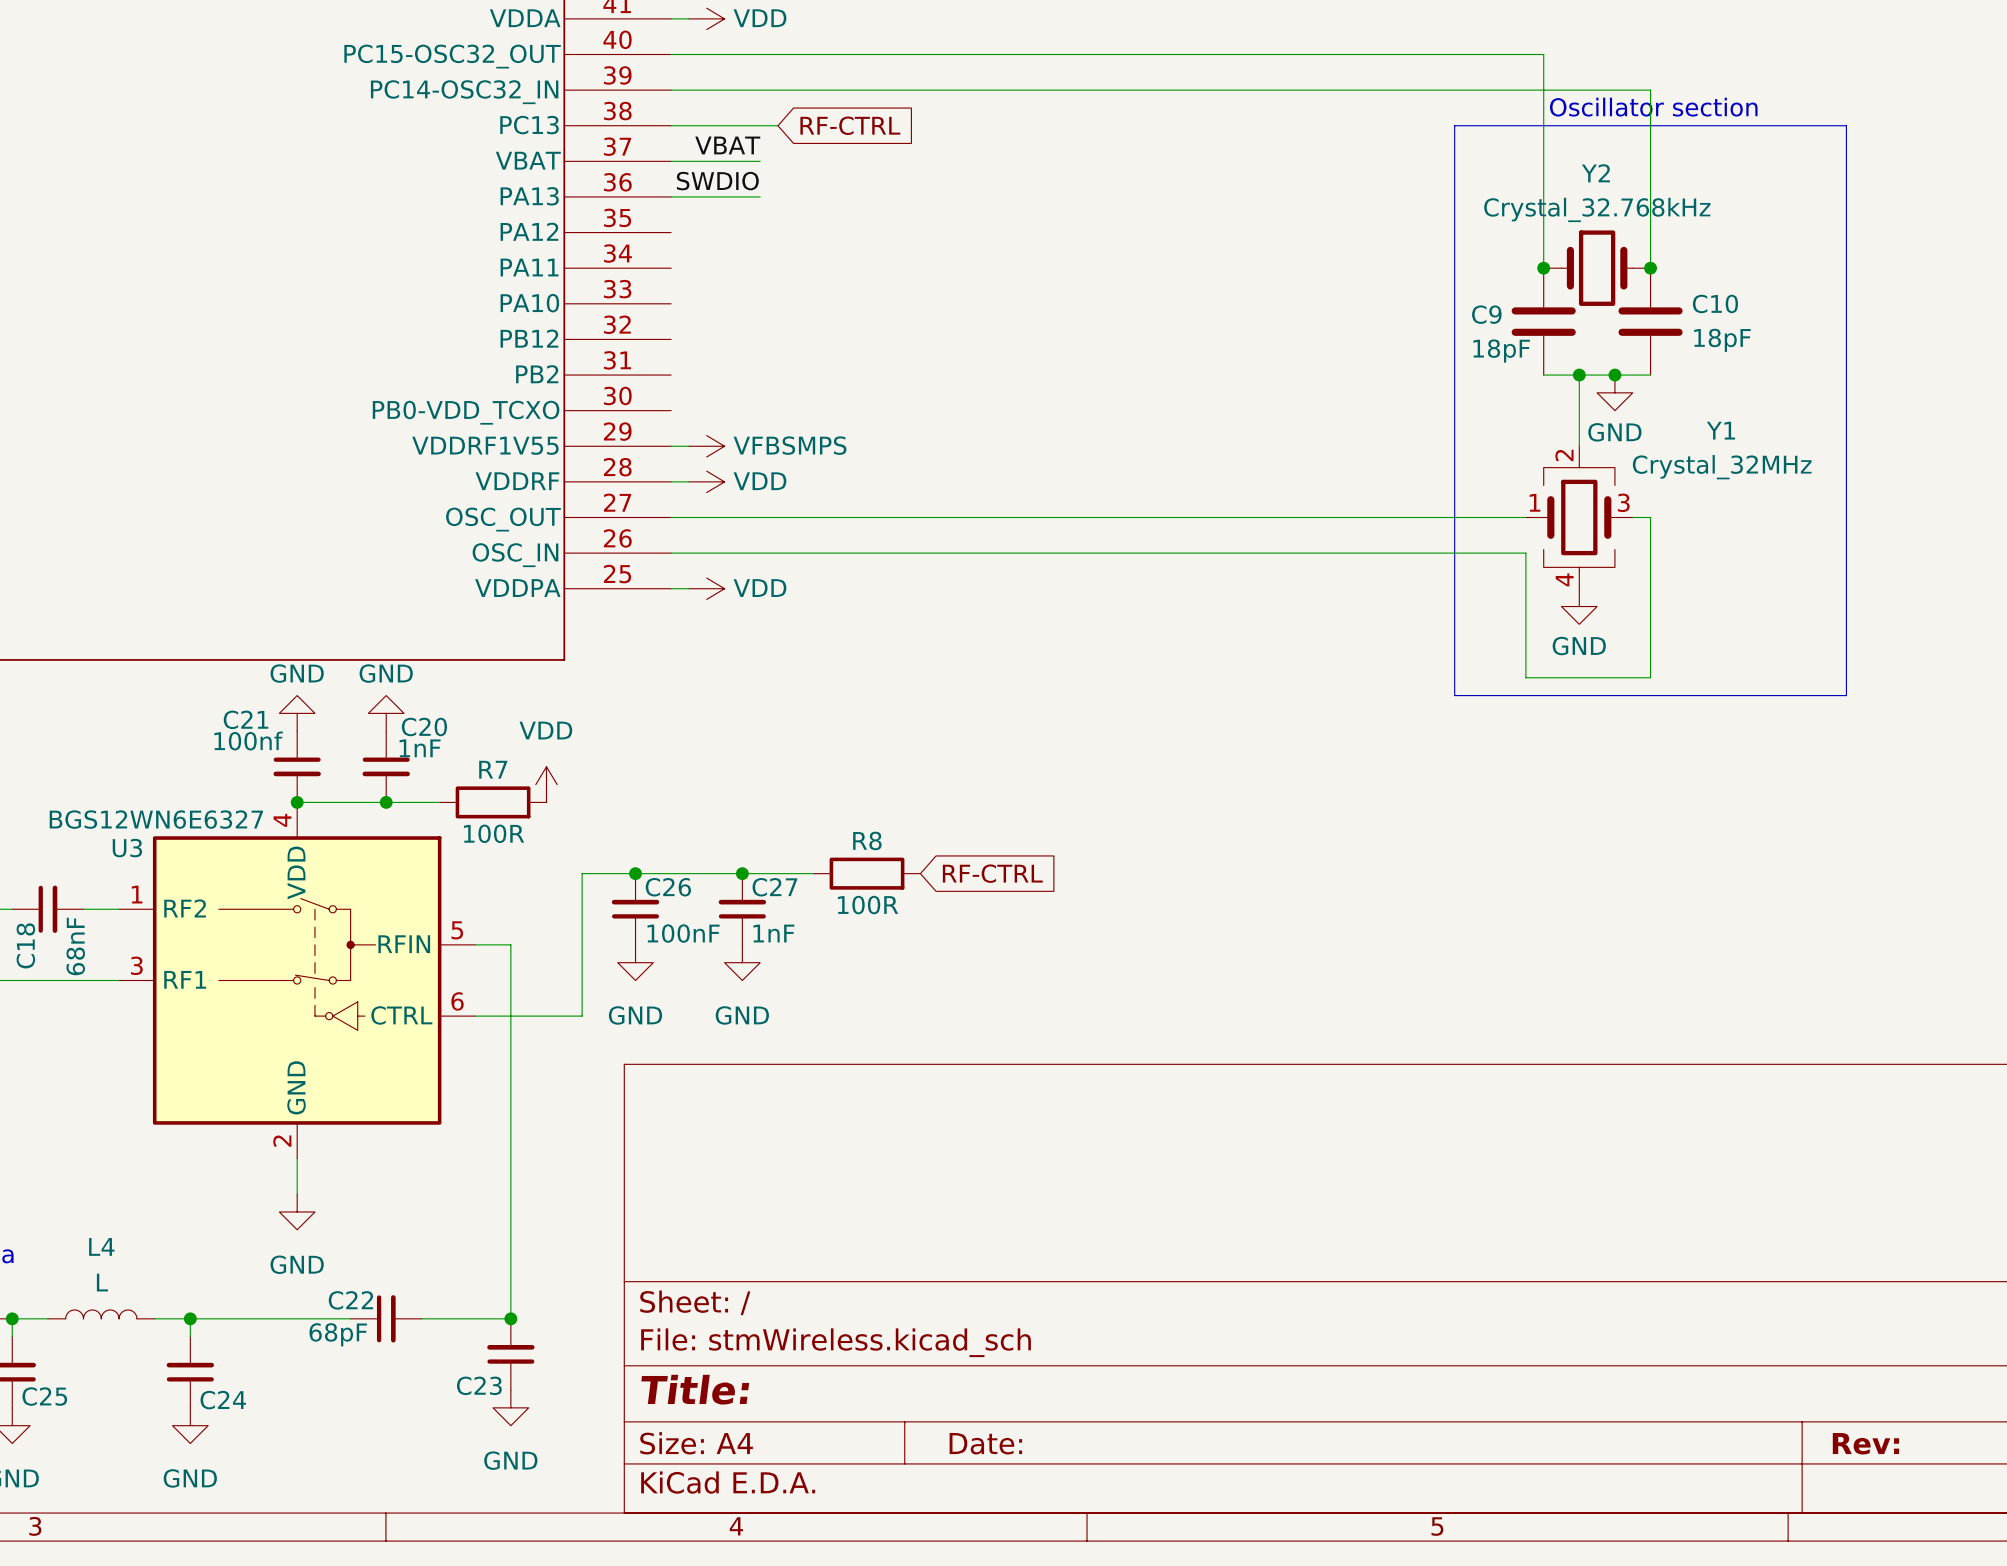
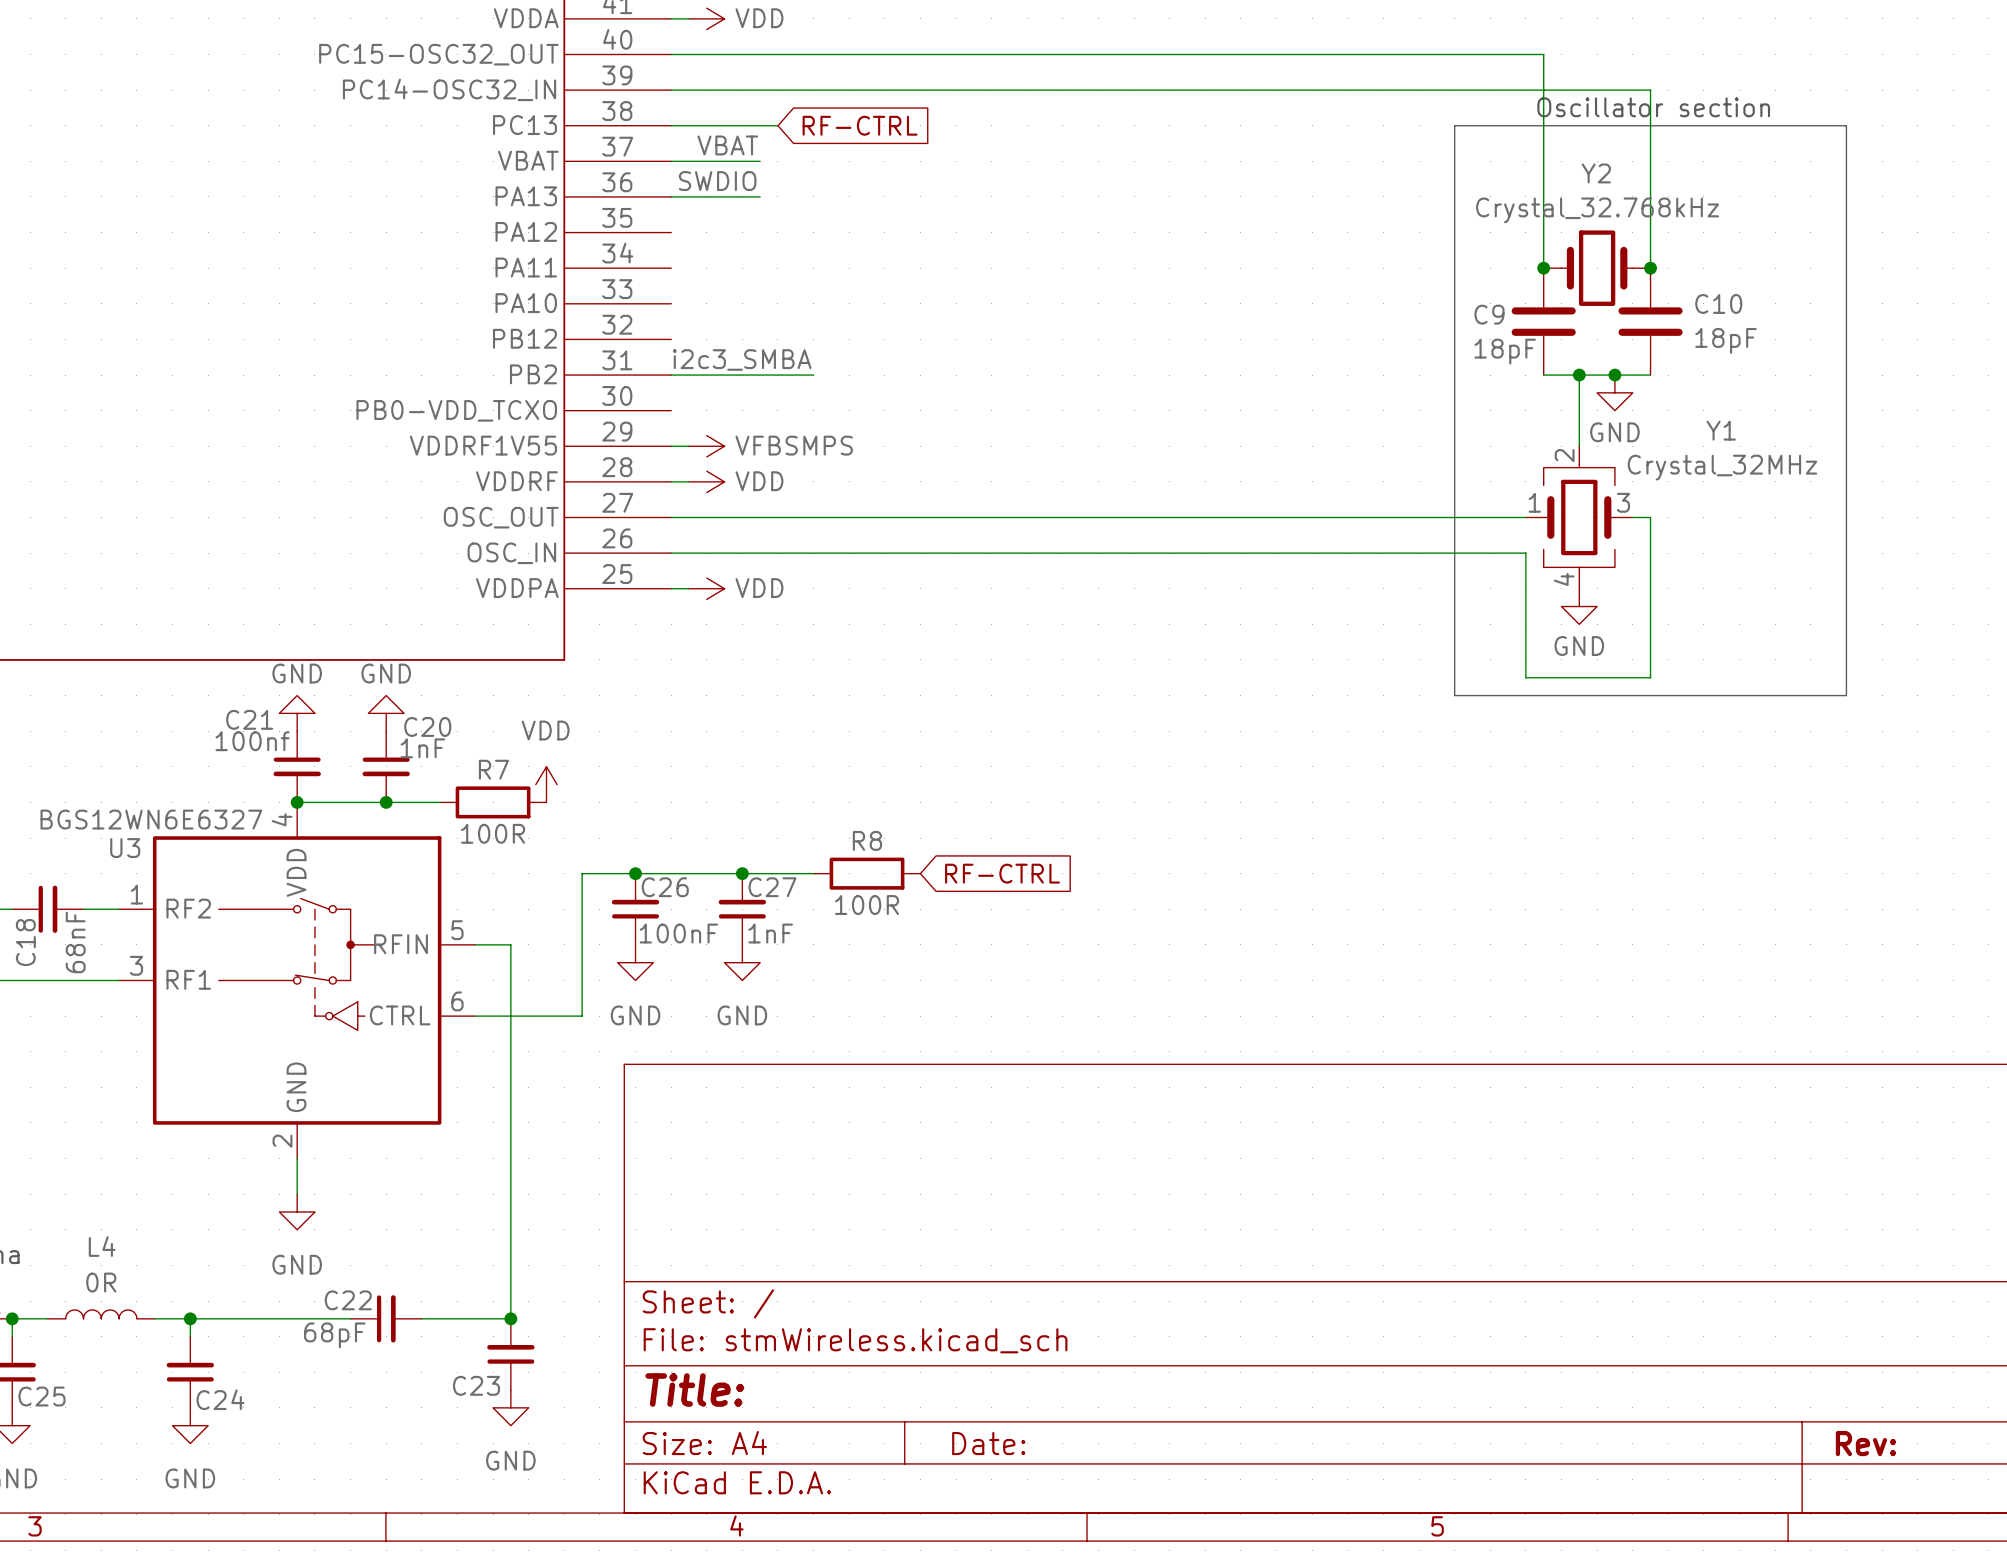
label: none -> i2c3_SMBA (742, 359)
wire: none -> (671, 375) (813, 375)
L4 value: L (102, 1282) -> 0R (101, 1282)

